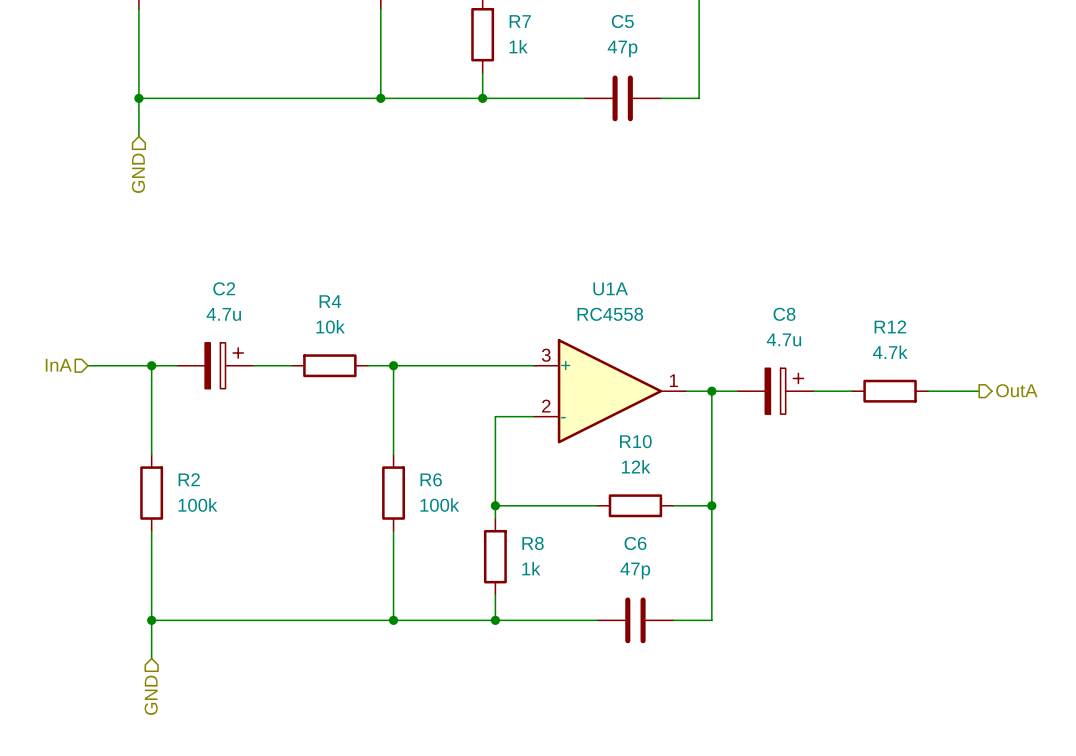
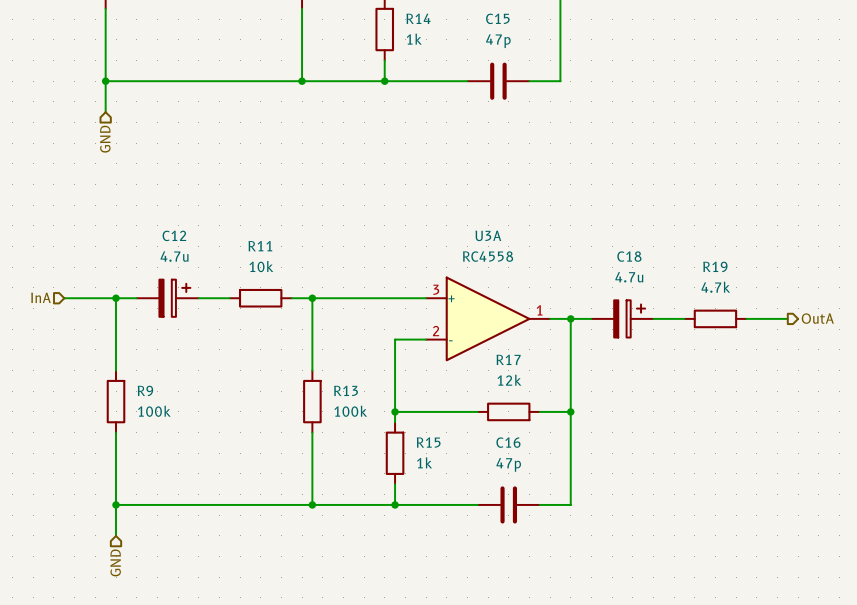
R7 name: R7 (520, 21) -> R14 (418, 18)
C5 name: C5 (622, 21) -> C15 (497, 18)
C2 name: C2 (224, 288) -> C12 (174, 235)
U1A name: U1A (610, 288) -> U3A (488, 235)
R4 name: R4 (330, 301) -> R11 (260, 246)
C8 name: C8 (784, 314) -> C18 (629, 256)
R12 name: R12 (890, 326) -> R19 (715, 266)
R10 name: R10 (635, 441) -> R17 (508, 359)
R2 name: R2 (189, 479) -> R9 (145, 390)
R6 name: R6 (431, 479) -> R13 (346, 390)
R8 name: R8 (533, 543) -> R15 (428, 442)
C6 name: C6 (635, 543) -> C16 (508, 442)

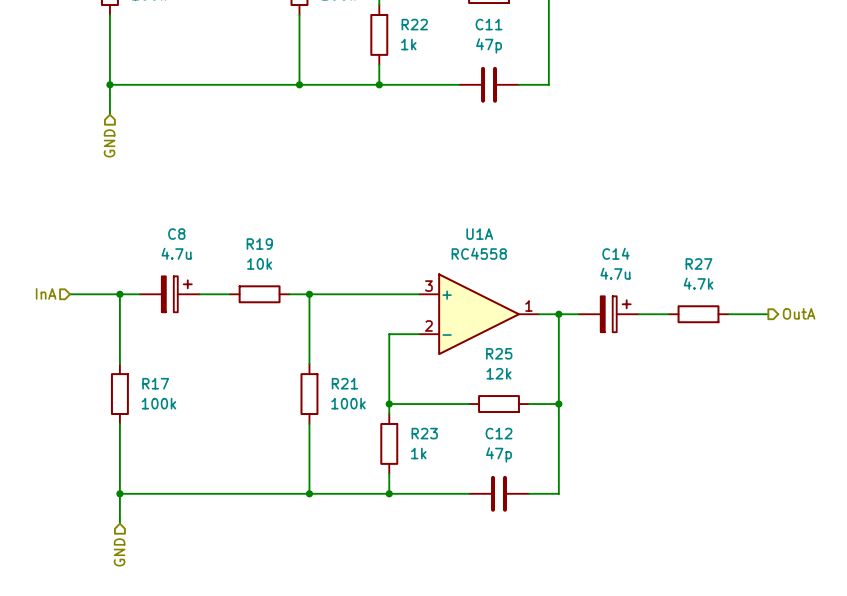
R14 name: R14 (418, 18) -> R22 (414, 24)
C15 name: C15 (497, 18) -> C11 (489, 24)
C12 name: C12 (174, 235) -> C8 (176, 234)
U3A name: U3A (488, 235) -> U1A (479, 234)
R11 name: R11 (260, 246) -> R19 (259, 244)
C18 name: C18 (629, 256) -> C14 (615, 253)
R19 name: R19 (715, 266) -> R27 (698, 264)
R17 name: R17 (508, 359) -> R25 (499, 353)
R9 name: R9 (145, 390) -> R17 (155, 383)
R13 name: R13 (346, 390) -> R21 (344, 383)
R15 name: R15 (428, 442) -> R23 (424, 433)
C16 name: C16 (508, 442) -> C12 (498, 433)

